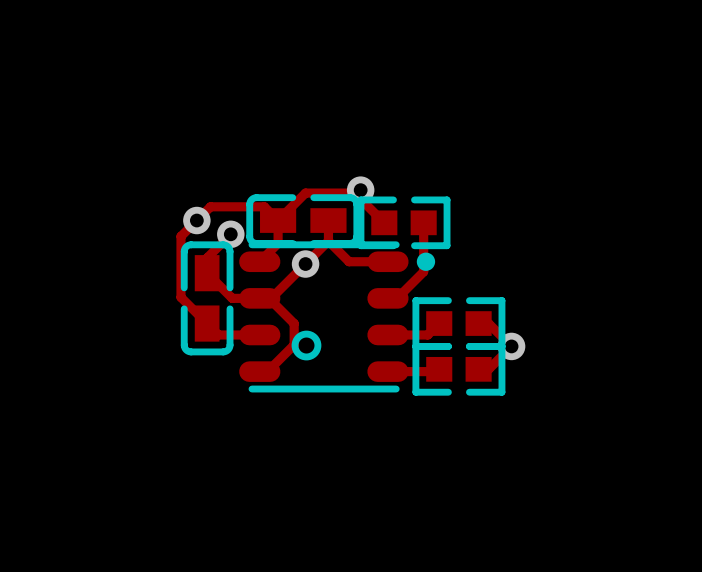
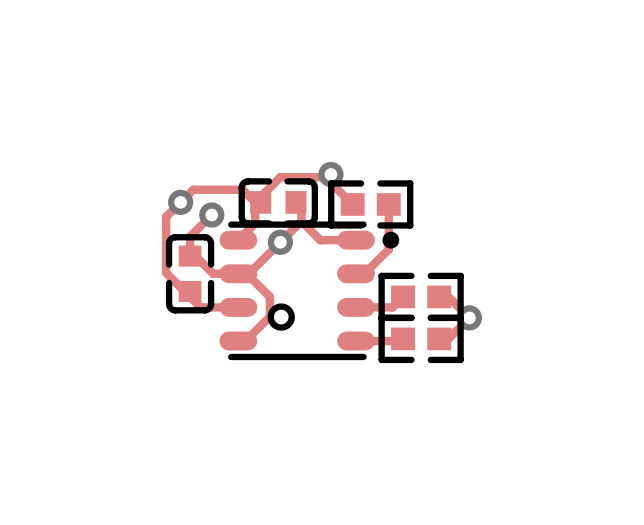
part footprint: [246, 194, 361, 247] -> [238, 178, 318, 227]
part footprint: [180, 241, 234, 356] -> [165, 234, 215, 314]

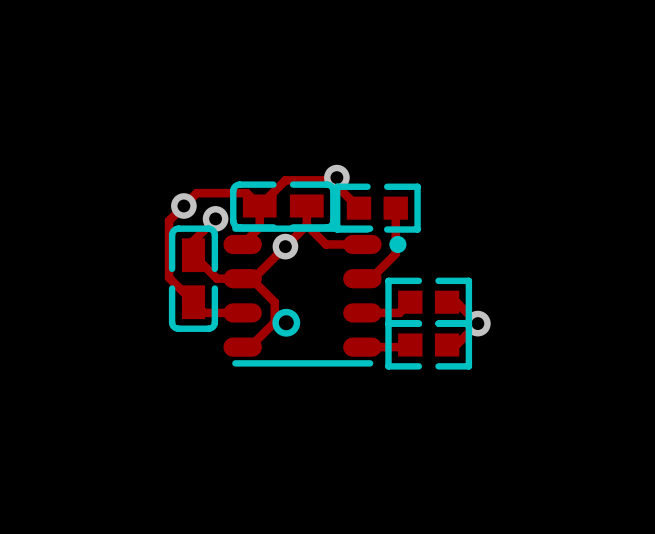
part footprint: [238, 178, 318, 227] -> [230, 181, 337, 231]
part footprint: [165, 234, 215, 314] -> [168, 225, 219, 332]

